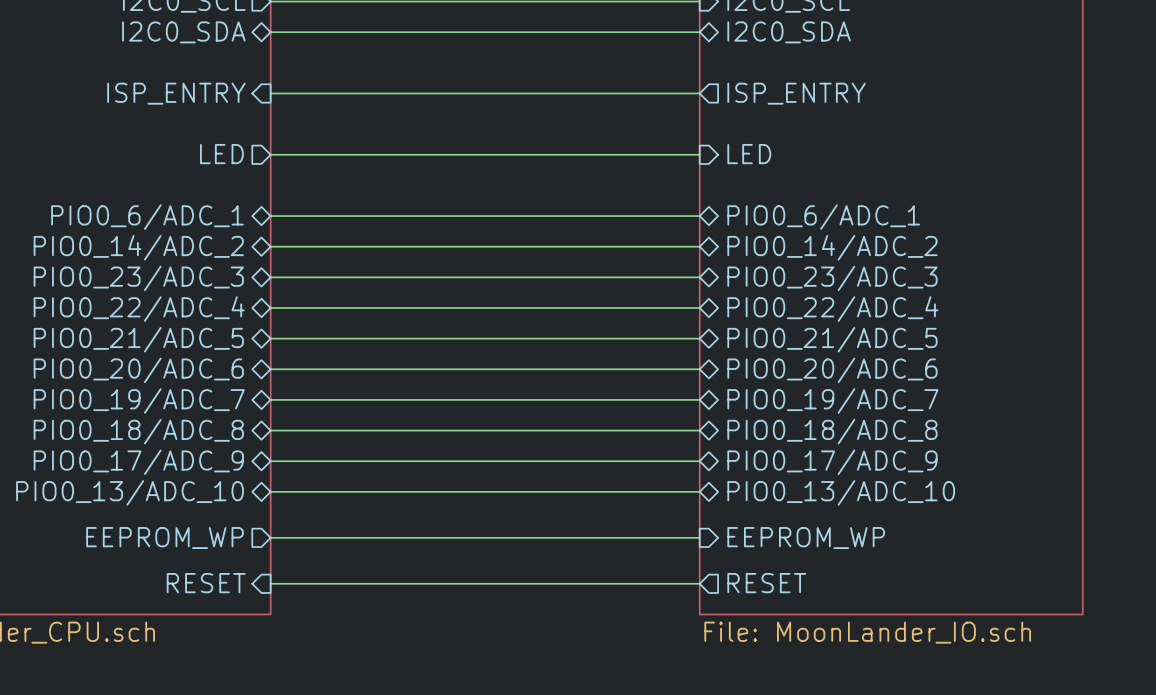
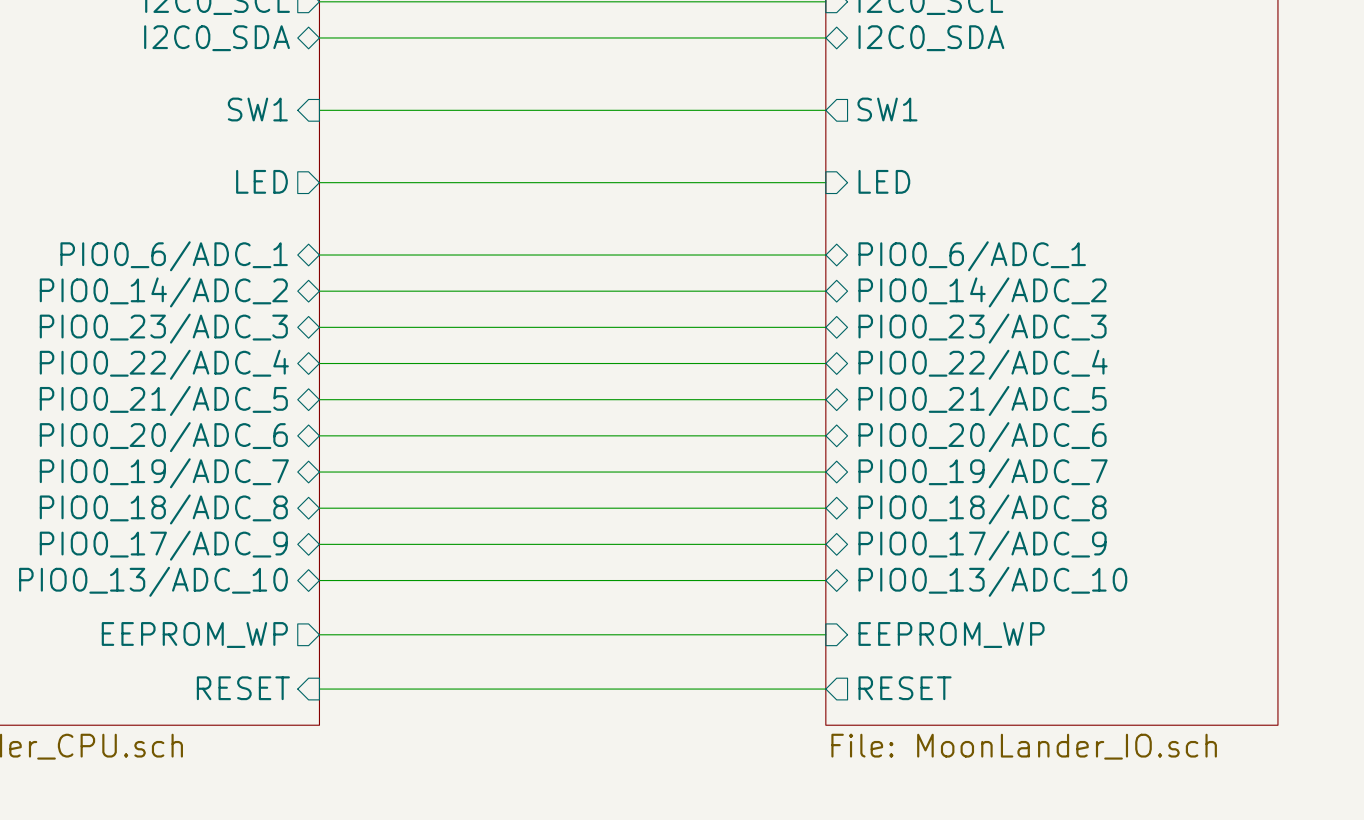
sheet pin: ISP_ENTRY (176, 93) -> SW1 (257, 109)
sheet pin: ISP_ENTRY (796, 93) -> SW1 (887, 109)

